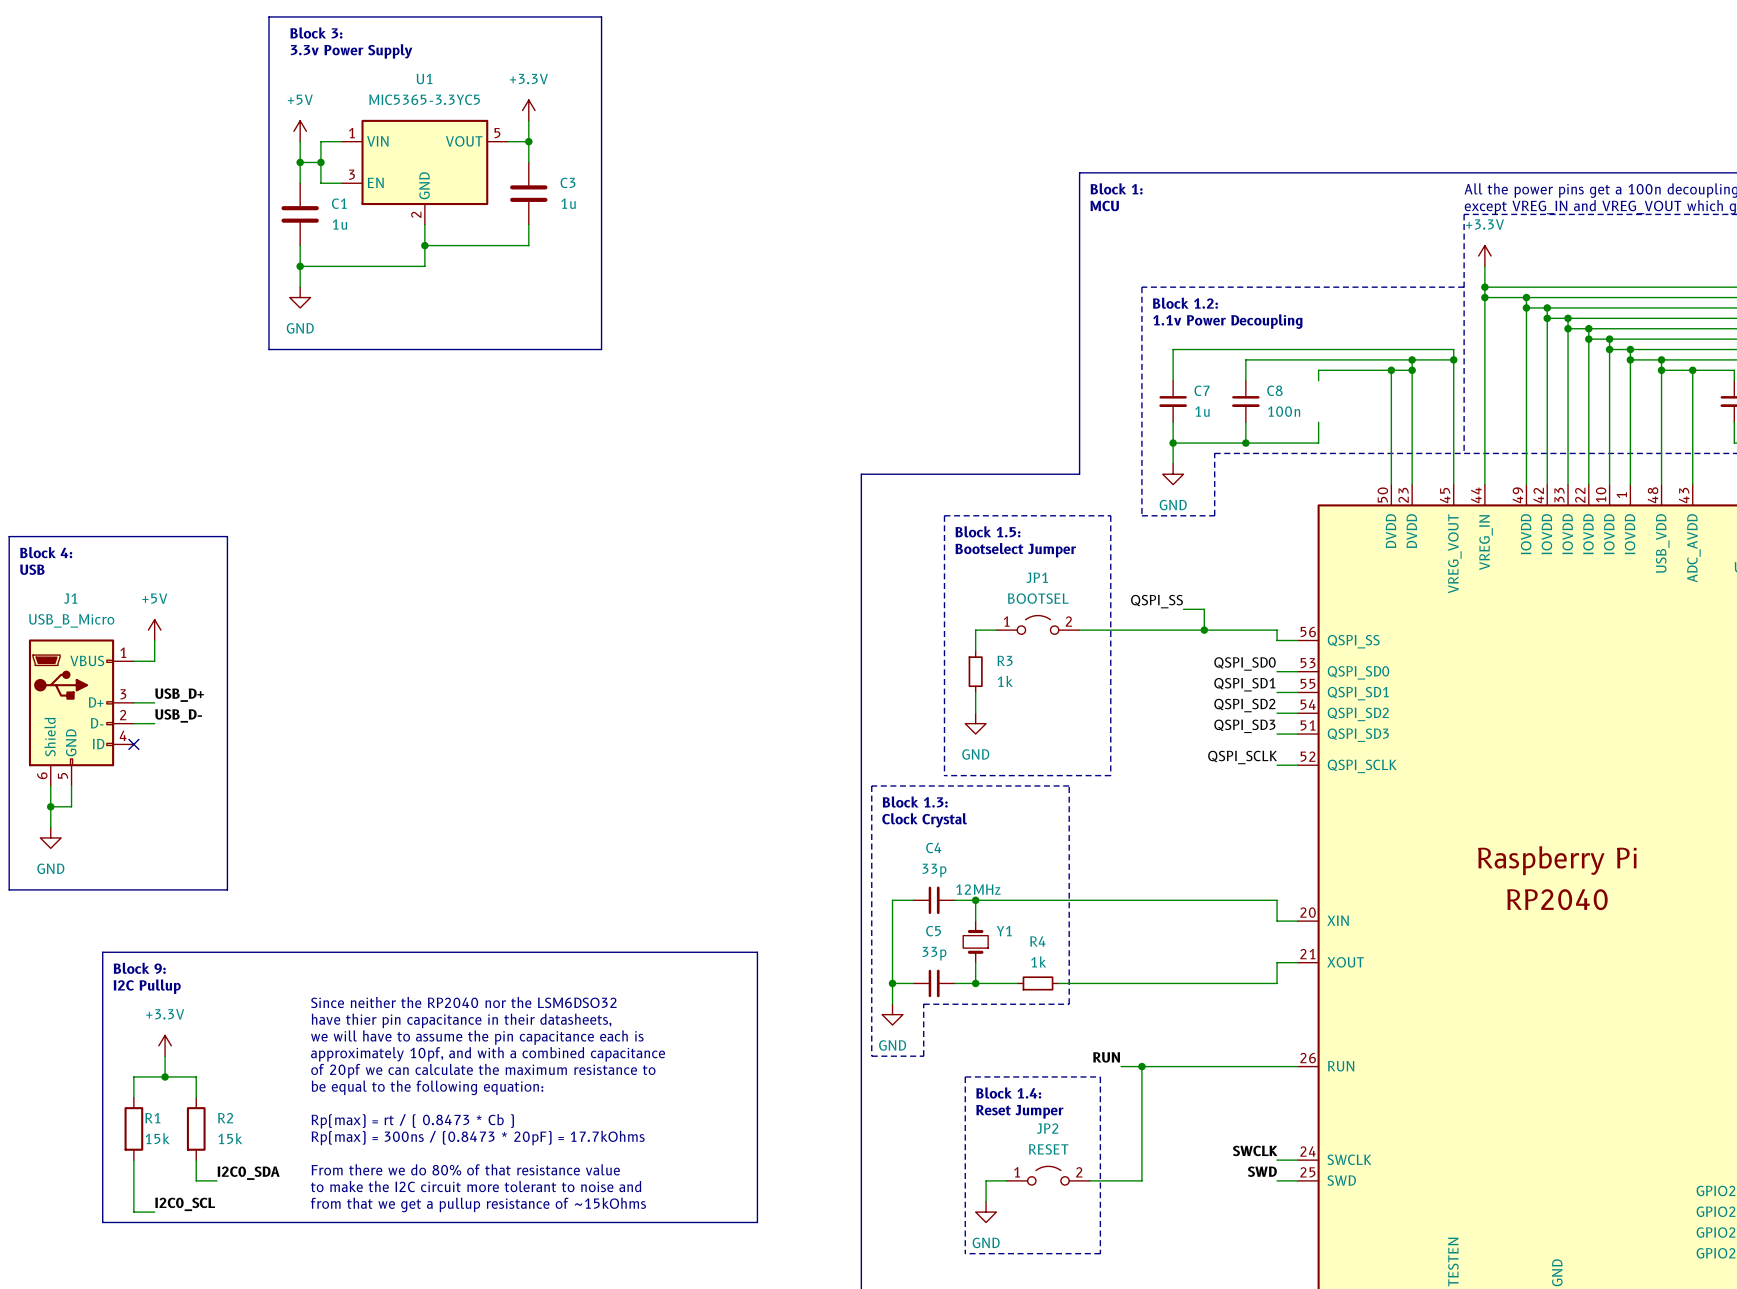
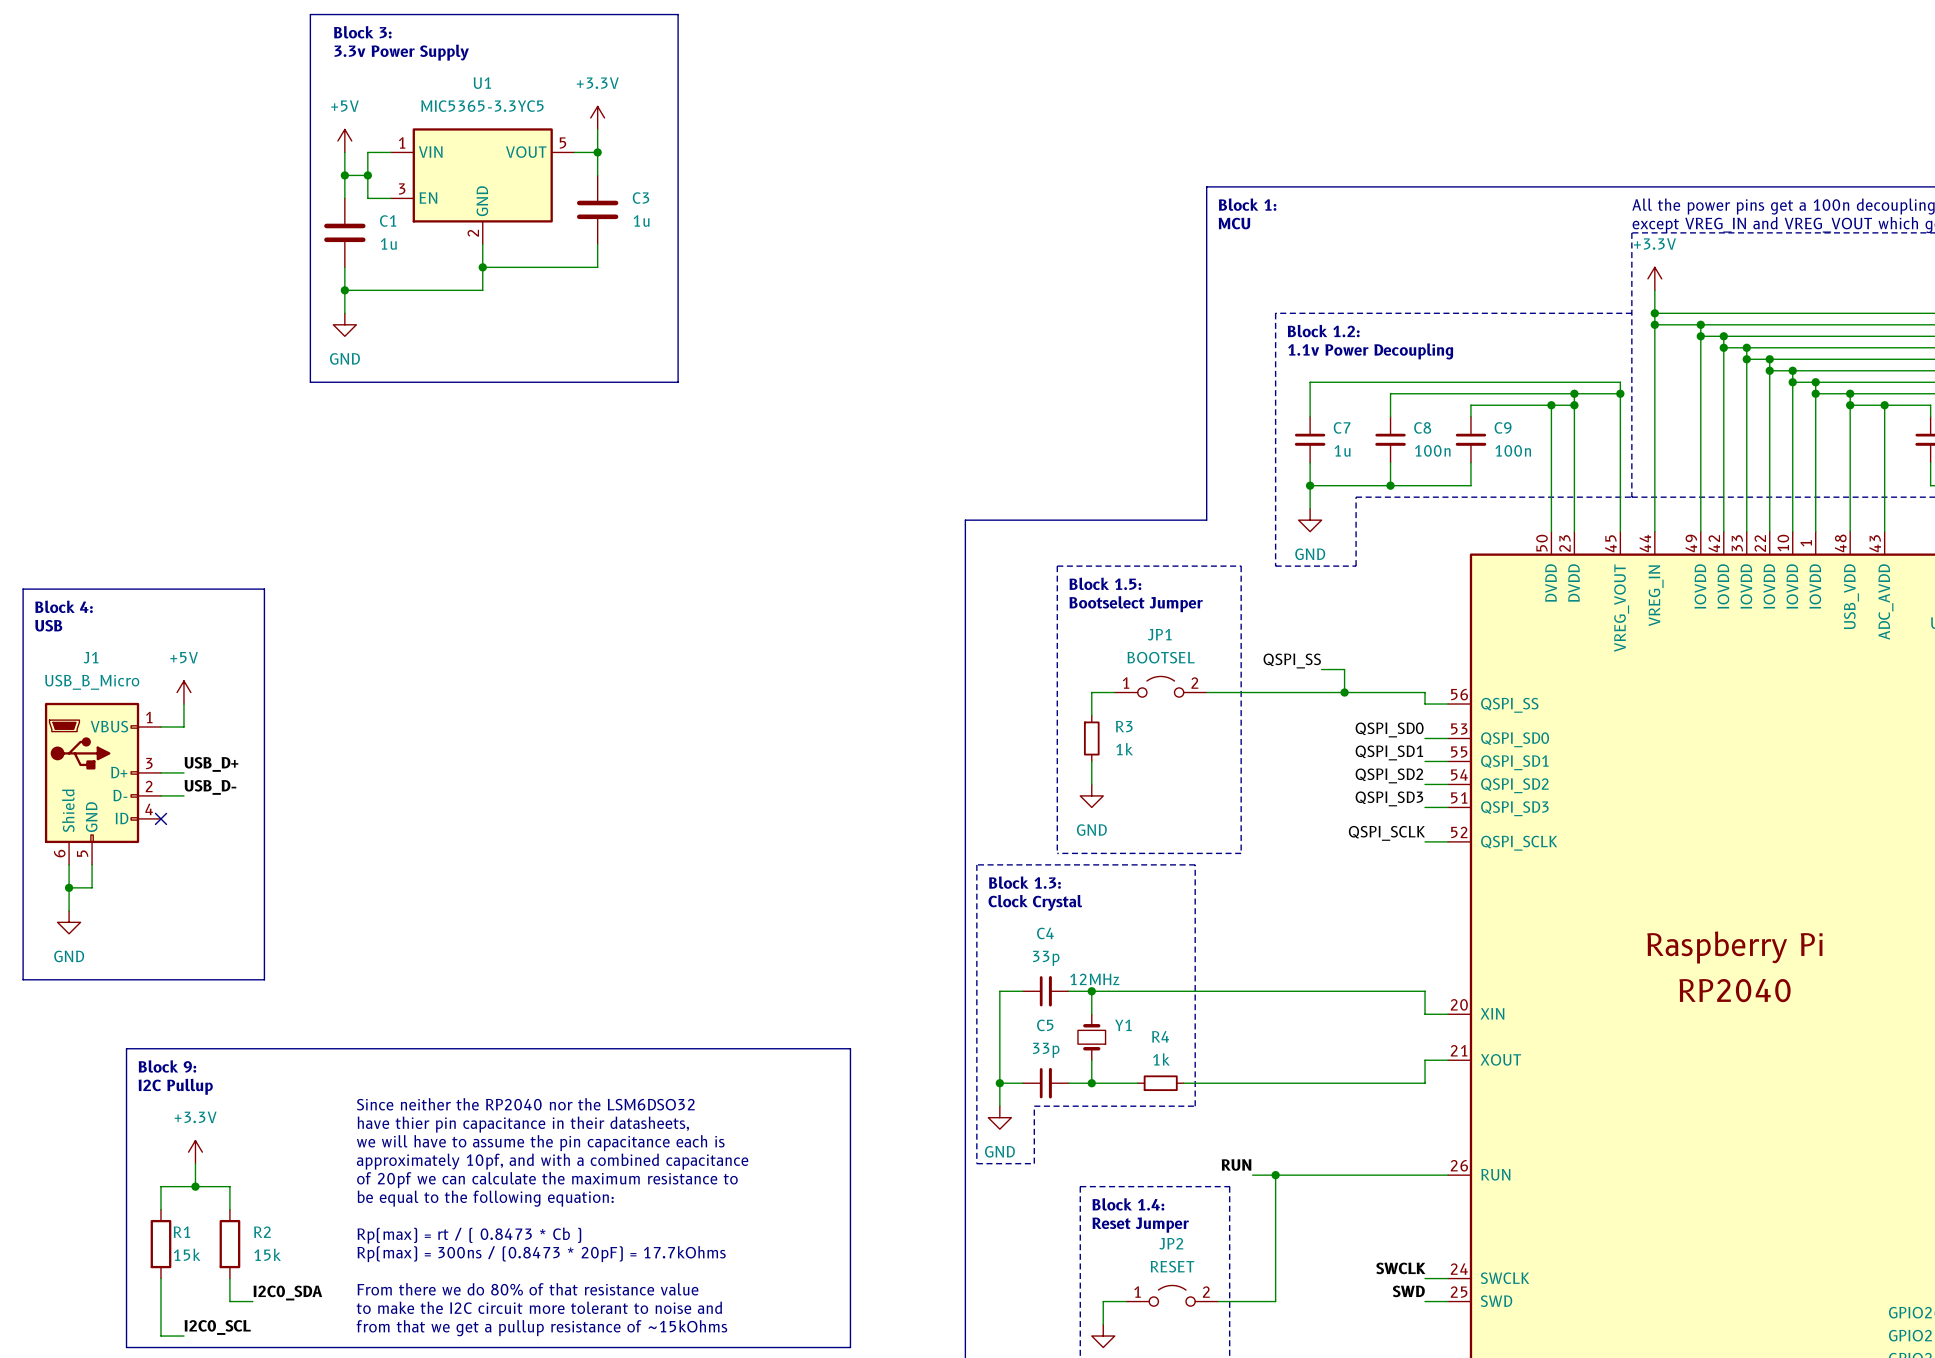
C9: none -> 100n (1470, 439)

